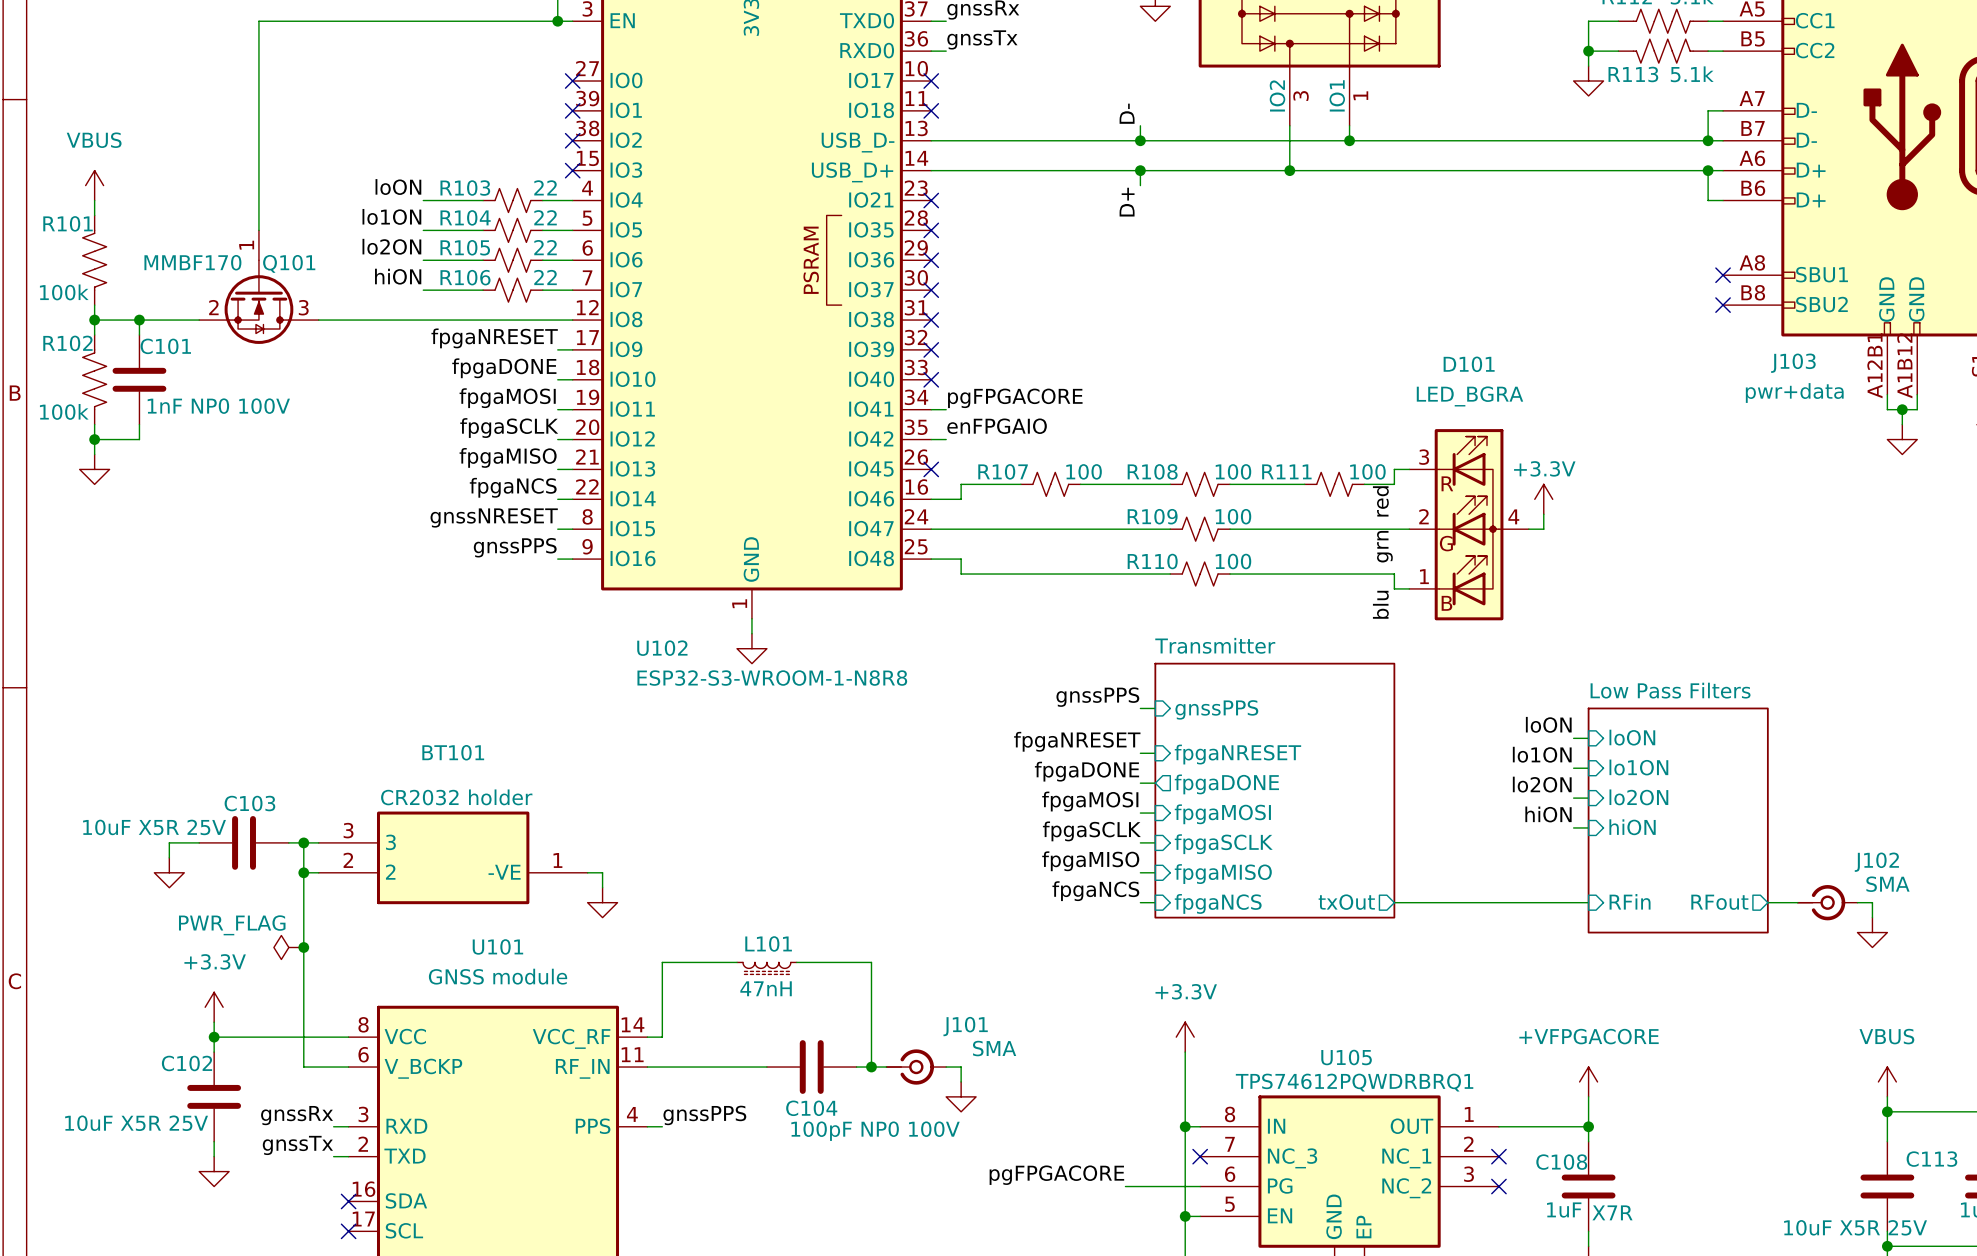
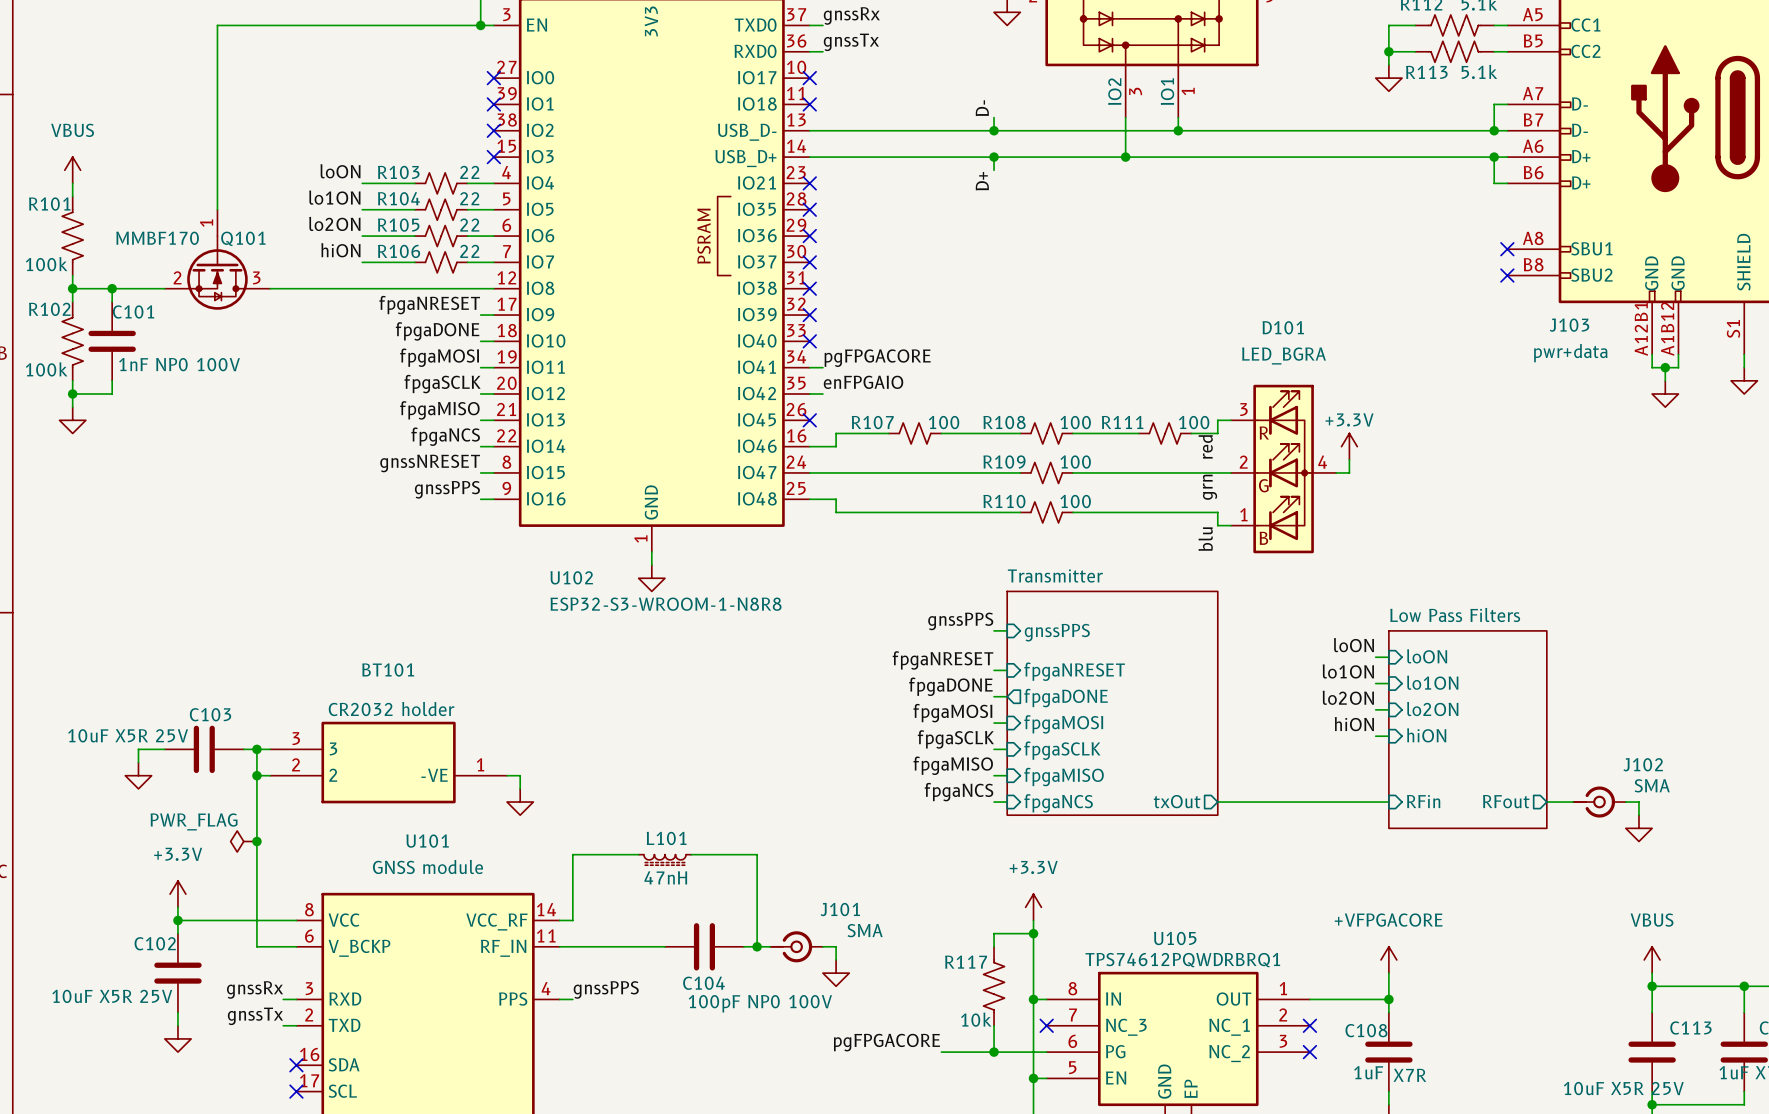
wire: none -> (1033, 920) (1033, 933) (994, 933) (994, 946)
power symbol position: +3.3V (1185, 1037) -> +3.3V (1033, 907)
junction: none -> (1033, 933)
R117: none -> 10k (994, 986)
wire: none -> (994, 1025) (994, 1052)
label position: pgFPGACORE (1056, 1175) -> pgFPGACORE (887, 1042)
wire: none -> (941, 1052) (980, 1052)
junction: none -> (994, 1052)

